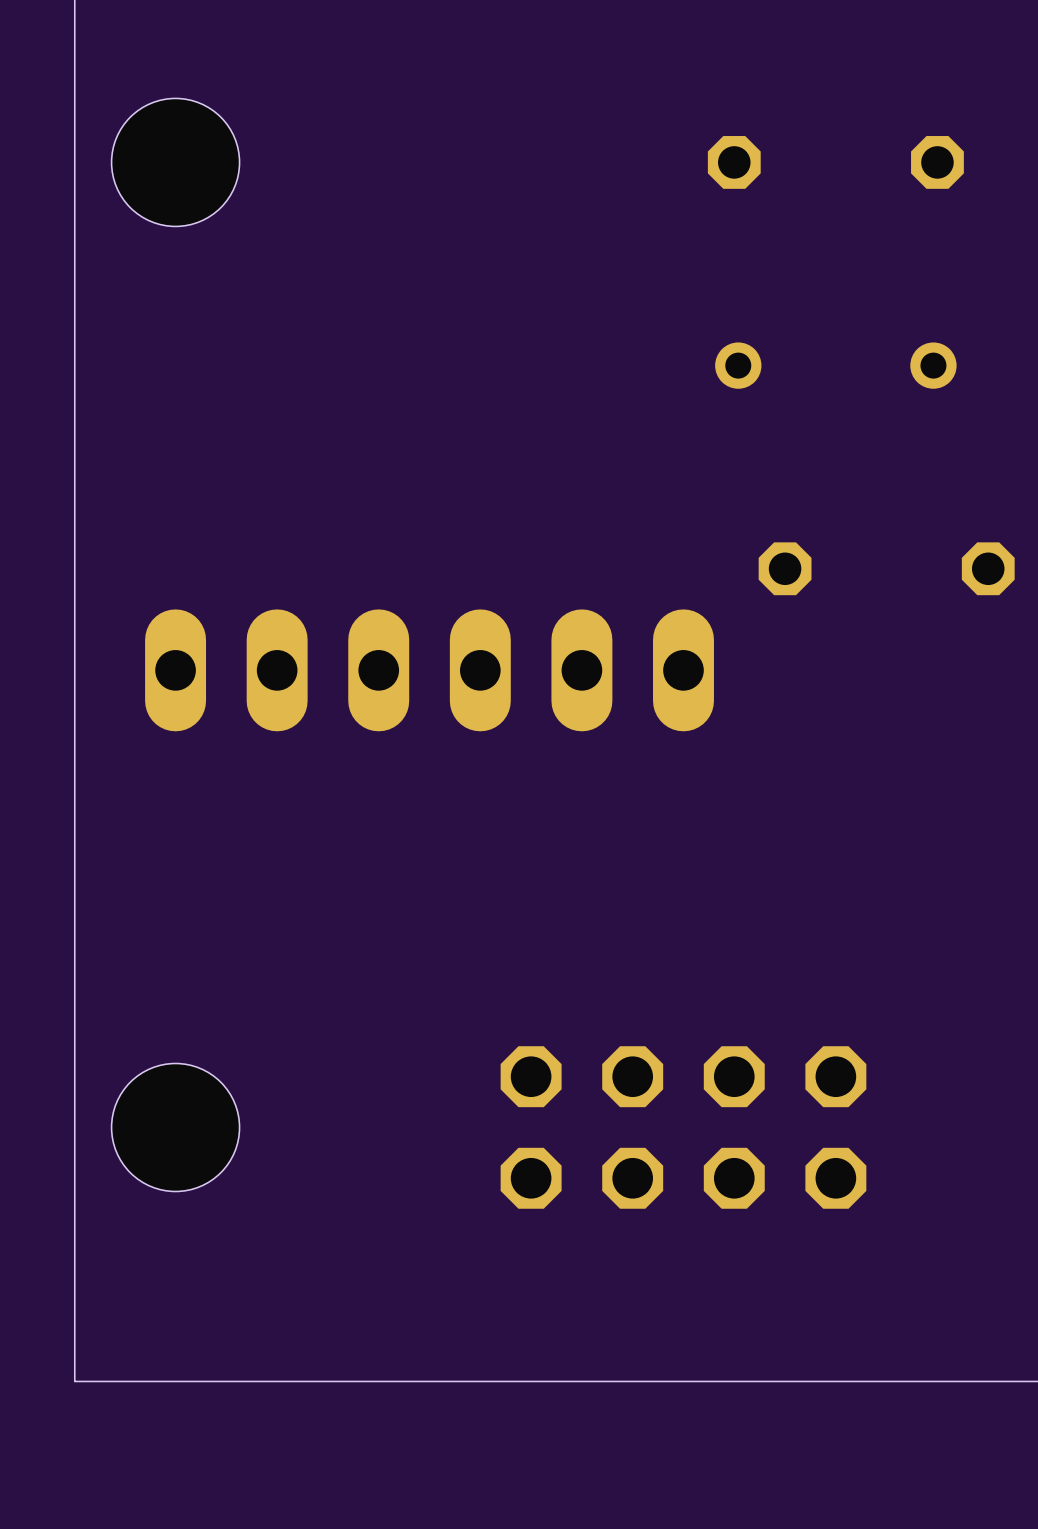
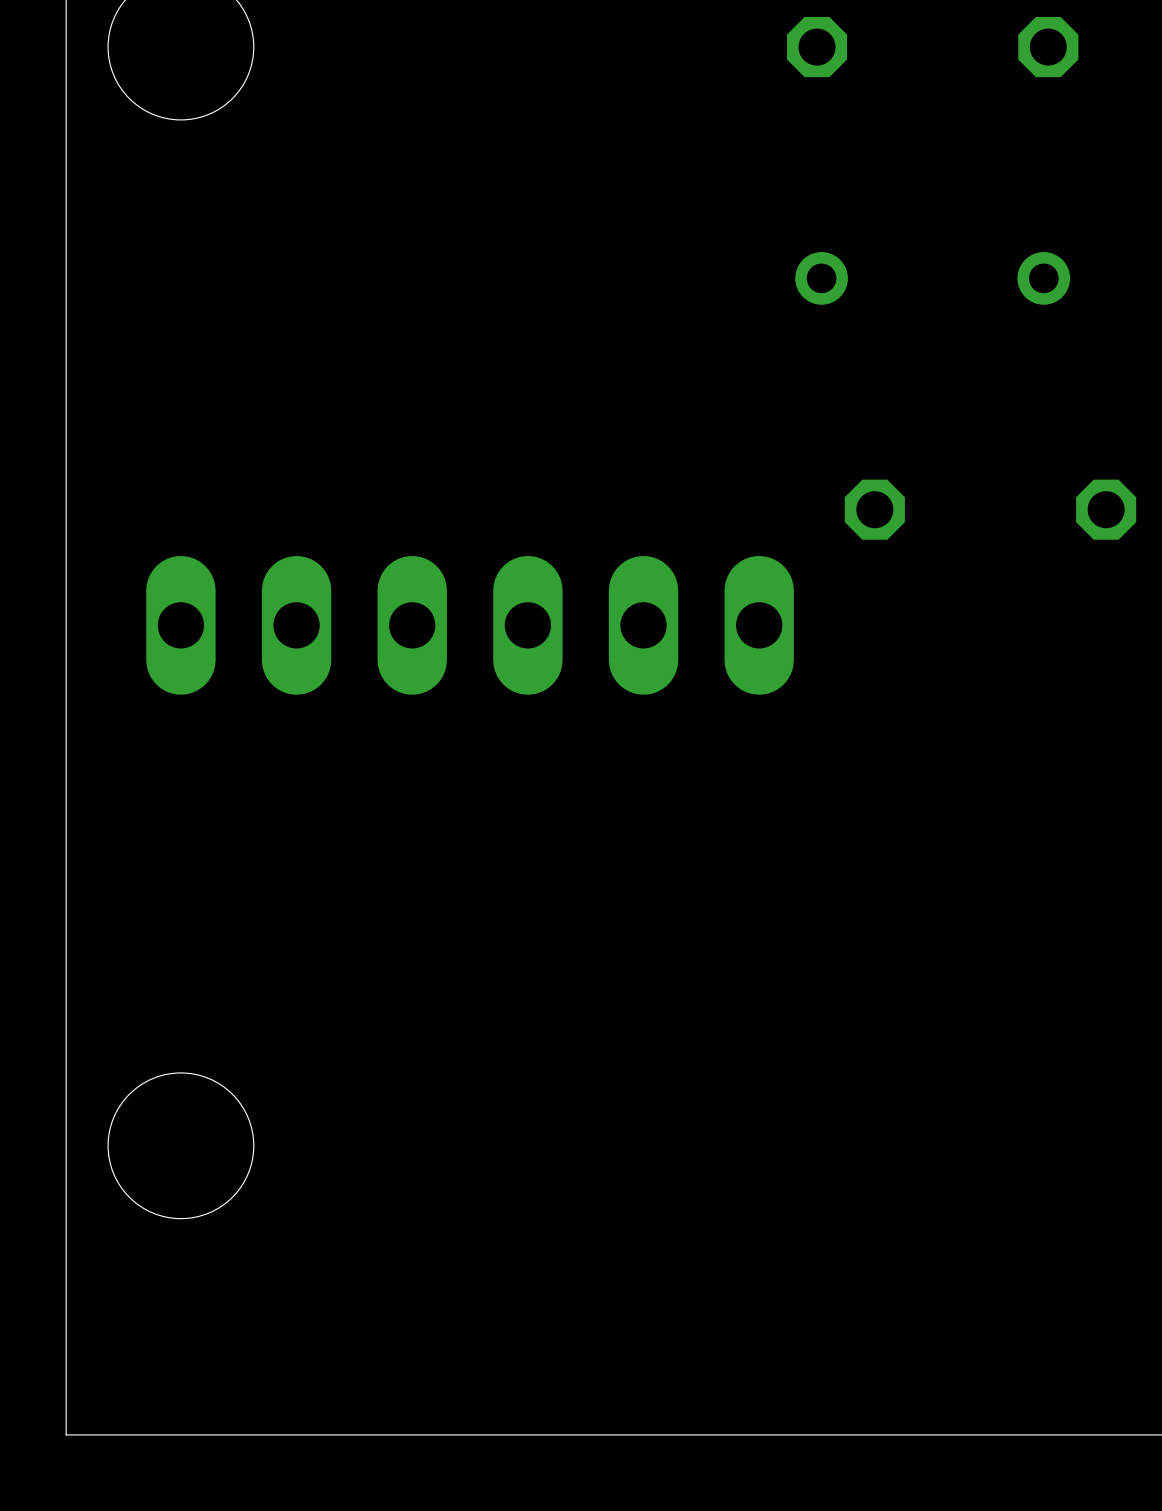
part: (683, 1127) -> none

